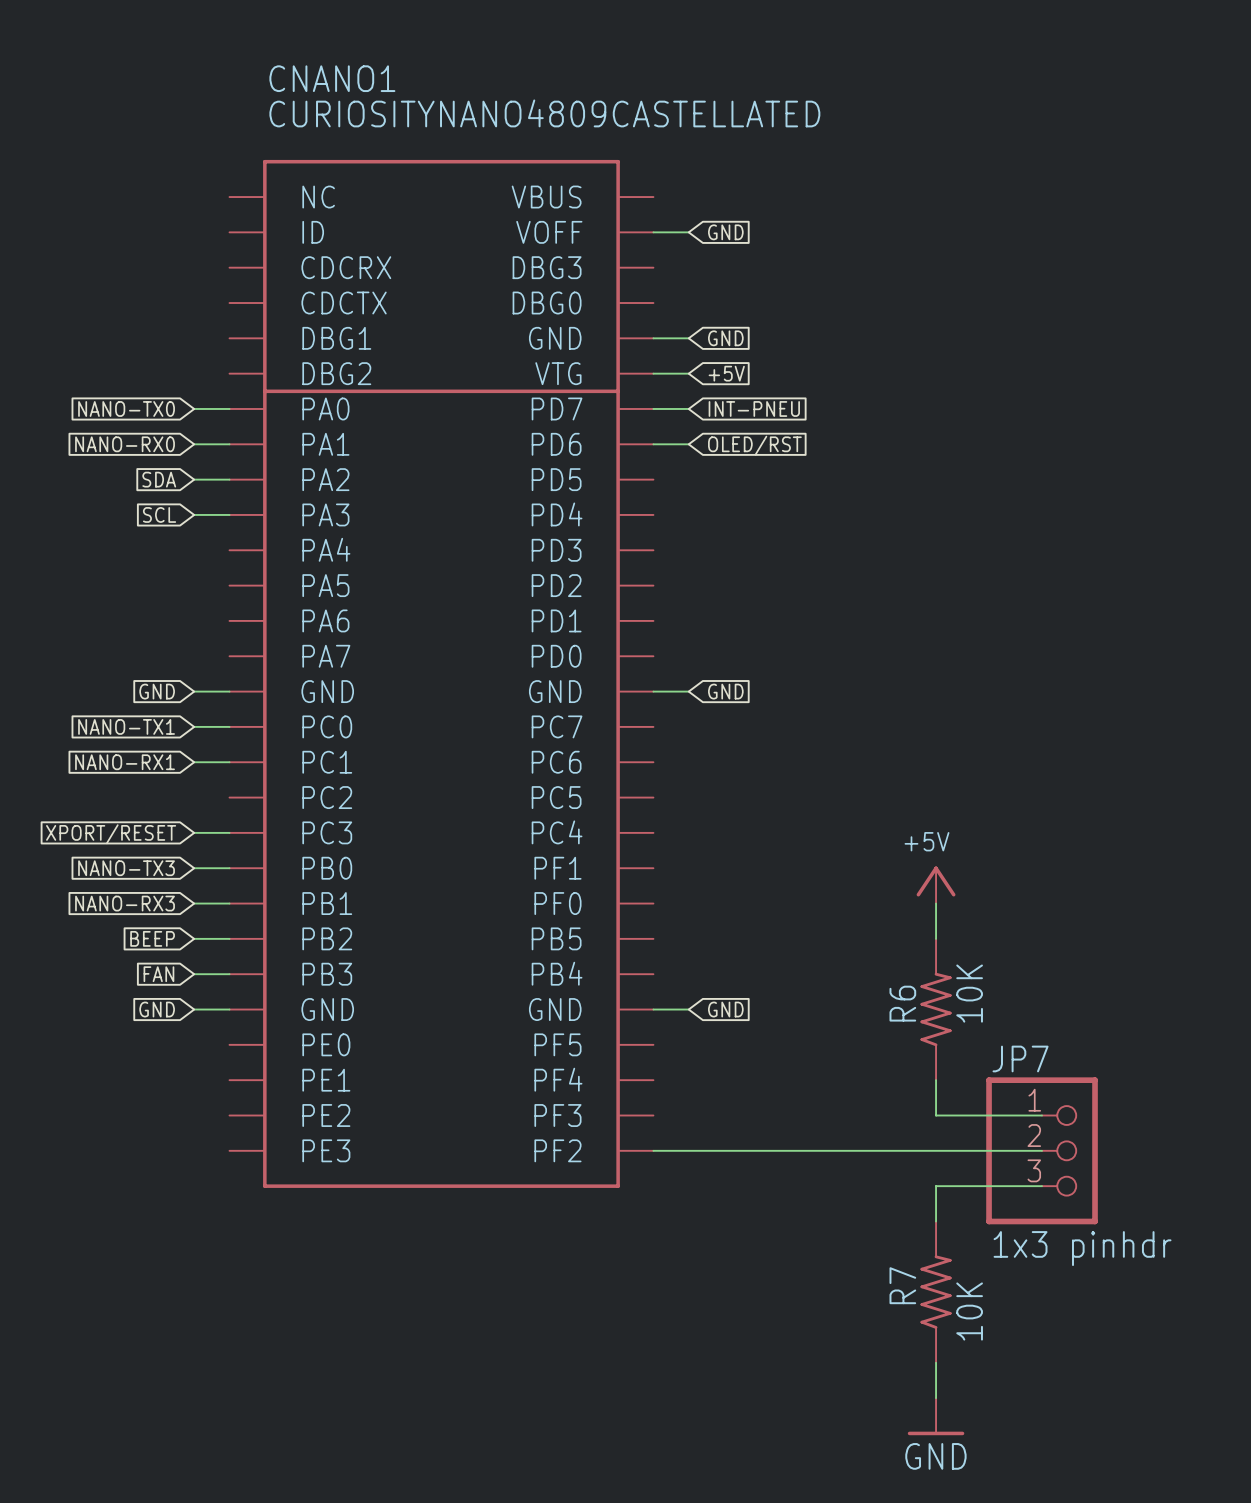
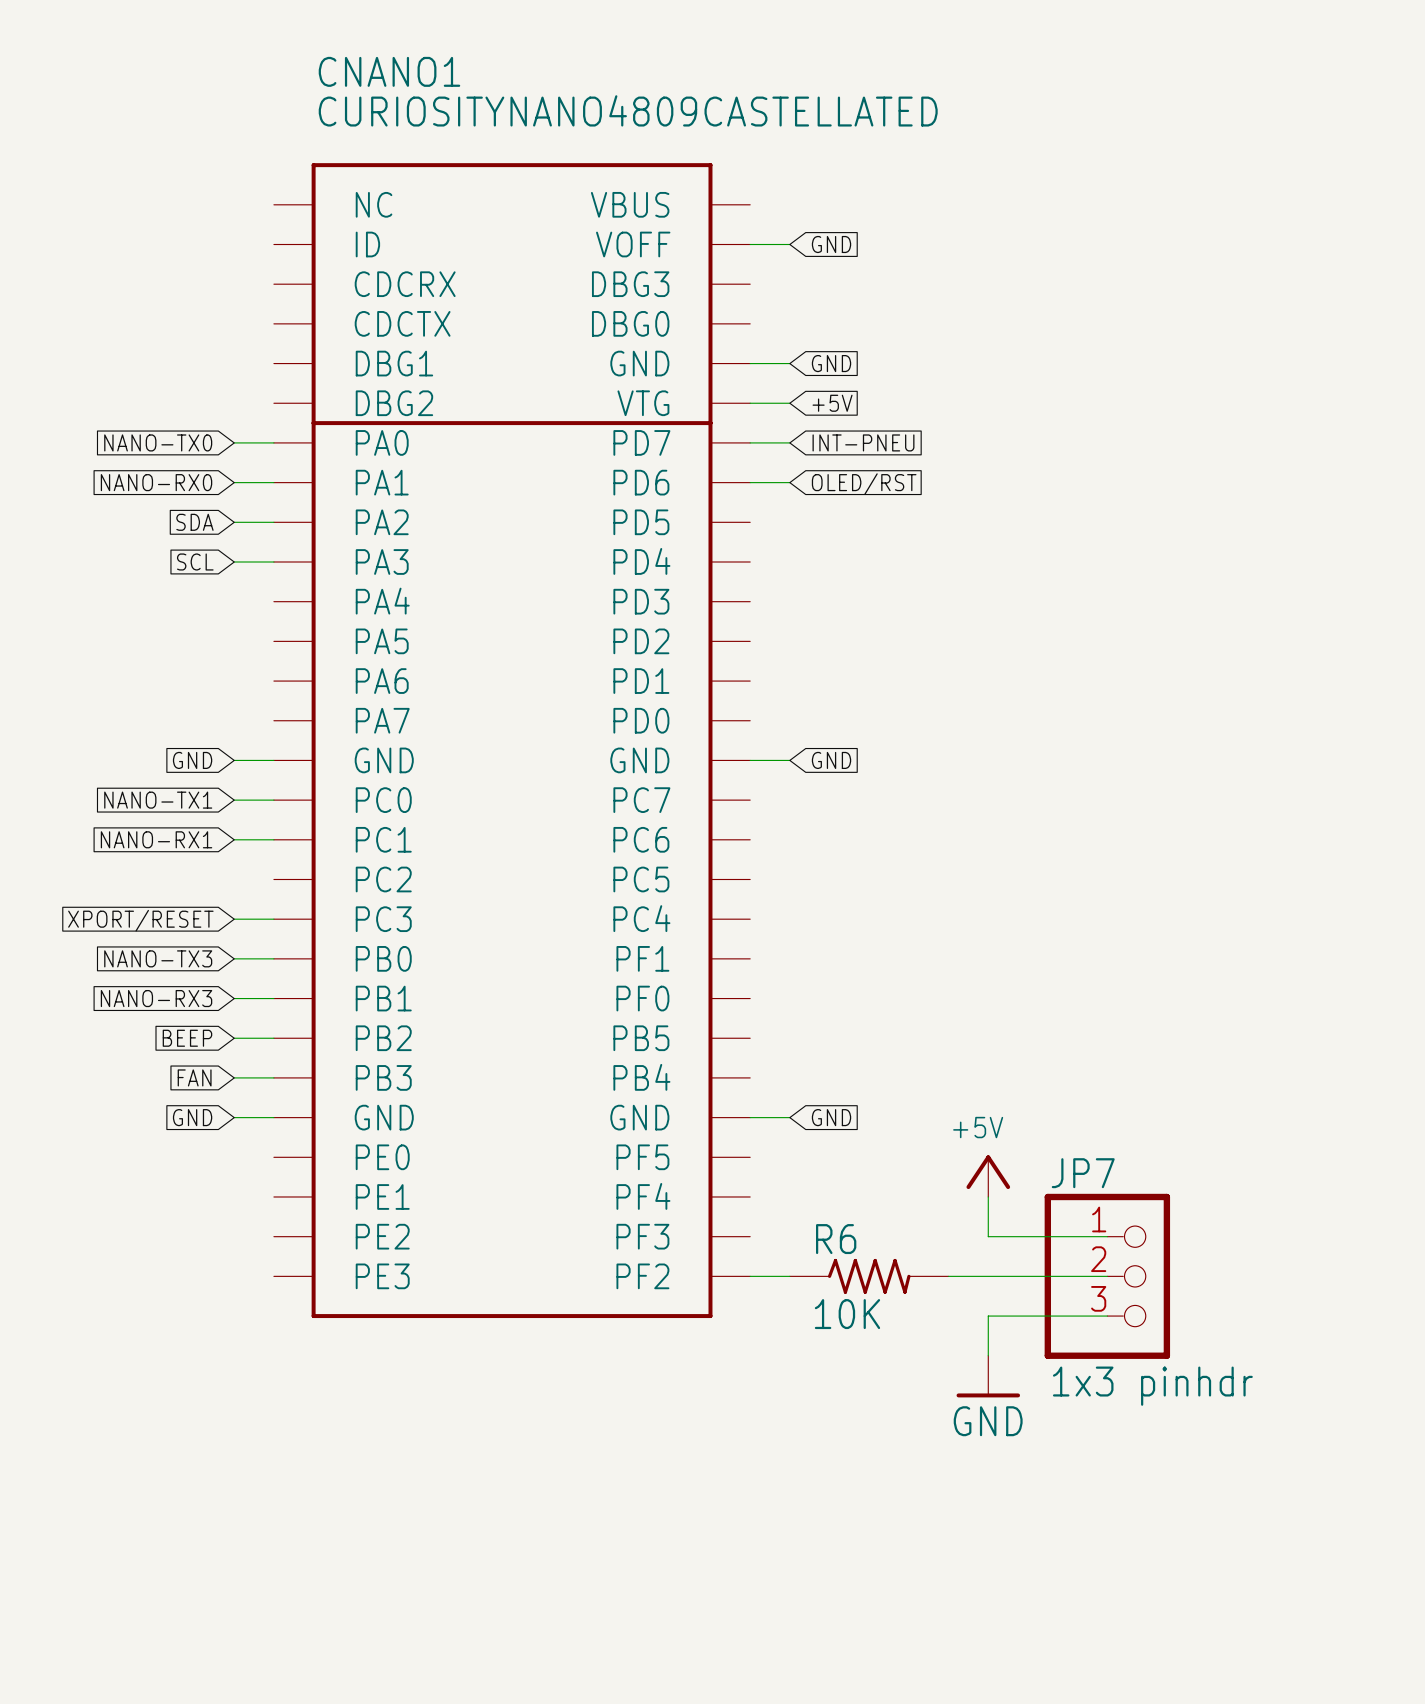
power symbol position: +5V (936, 885) -> +5V (988, 1176)
wire: (936, 903) (936, 938) -> none
R6 value position: 10K (969, 993) -> 10K (847, 1314)
R6 rotation: 0° (936, 1009) -> 90° clockwise (869, 1276)
R6 position: (936, 1009) -> (869, 1276)
wire: (936, 1080) (936, 1115) -> (988, 1196) (988, 1236) (1067, 1236)
wire: (971, 1115) (1042, 1115) -> none
wire: (971, 1150) (1042, 1150) -> none
JP7 position: (1042, 1150) -> (1107, 1276)
wire: (936, 1186) (936, 1221) -> (1067, 1316) (988, 1316) (988, 1355)
wire: (971, 1186) (1042, 1186) -> none
R7: 10K (936, 1292) -> none
wire: (936, 1362) (936, 1398) -> none
power symbol position: GND (936, 1416) -> GND (988, 1376)

